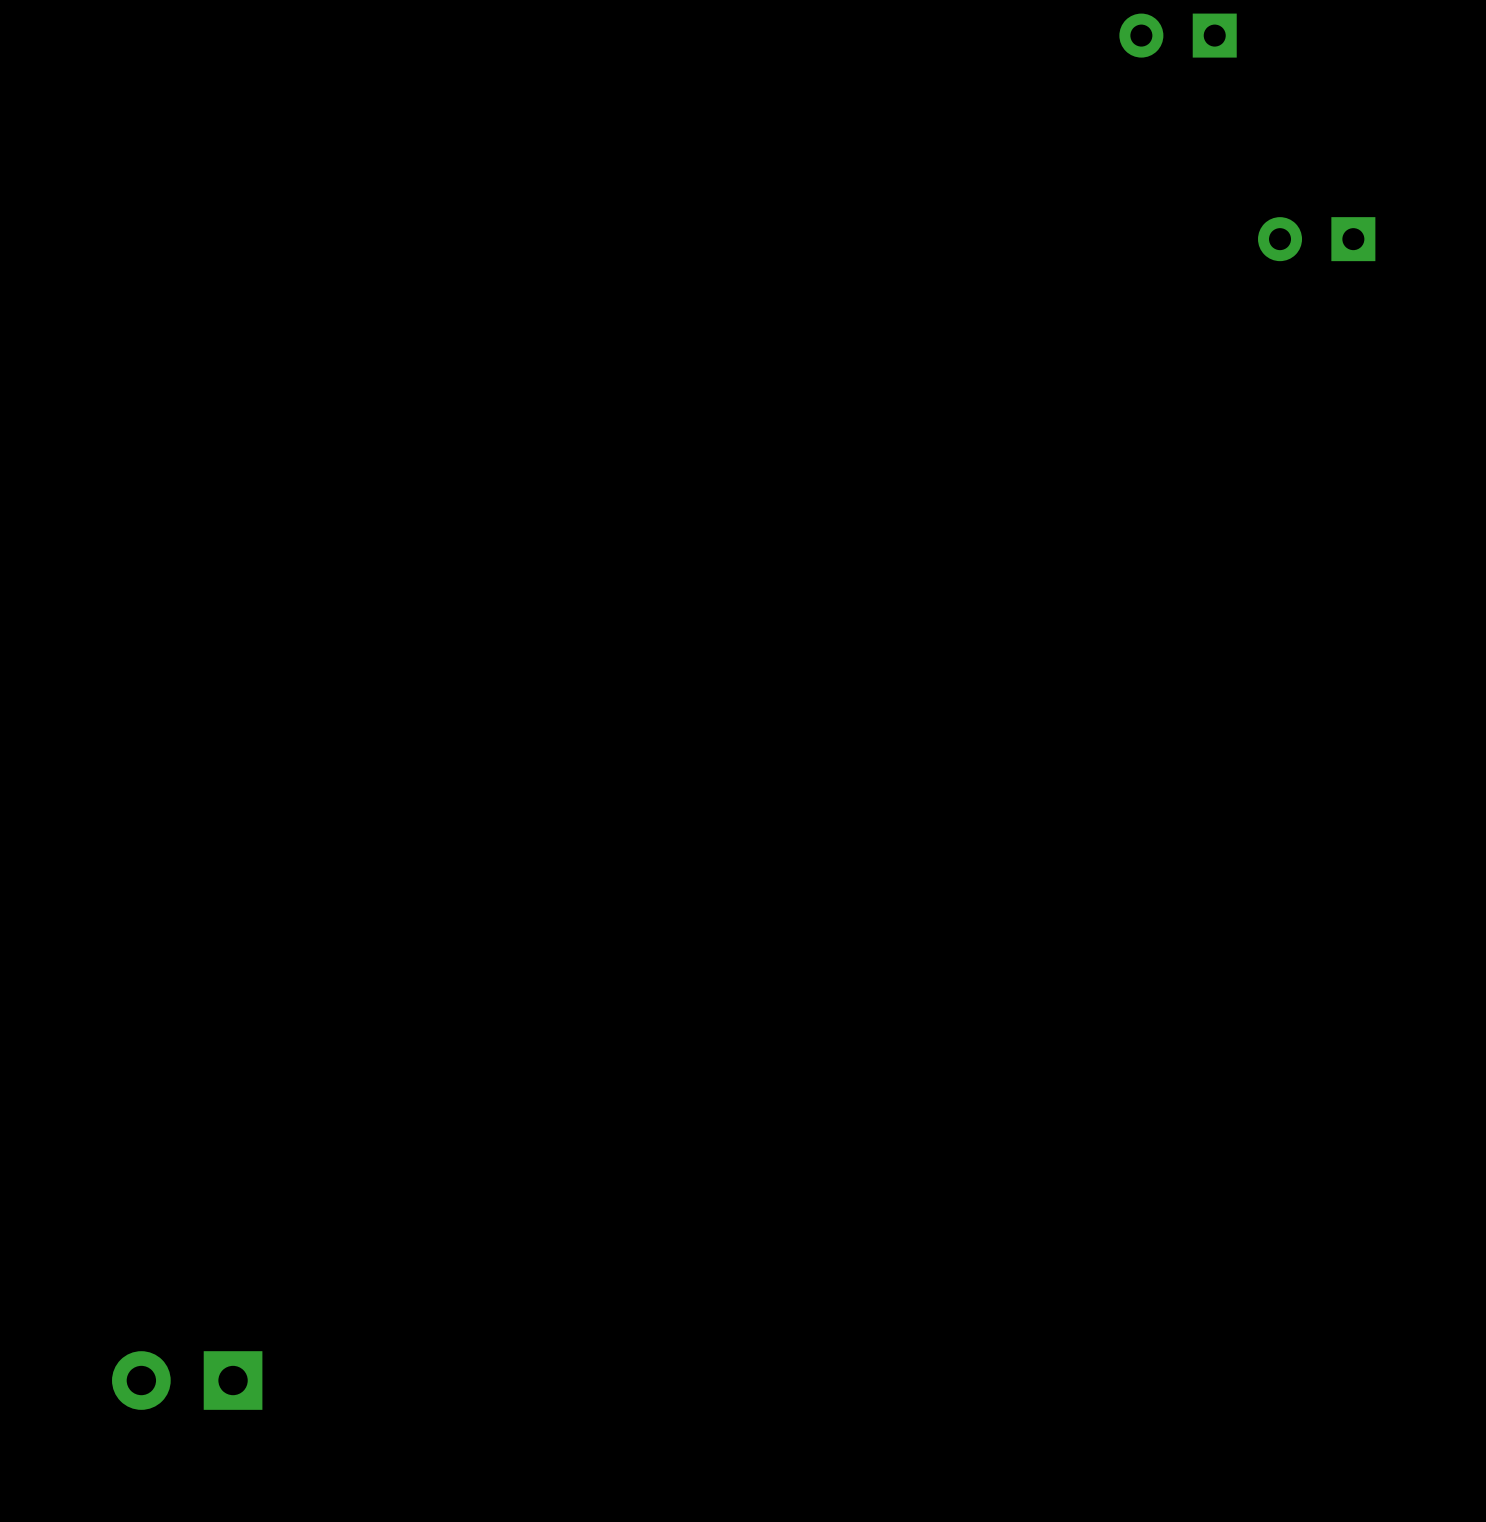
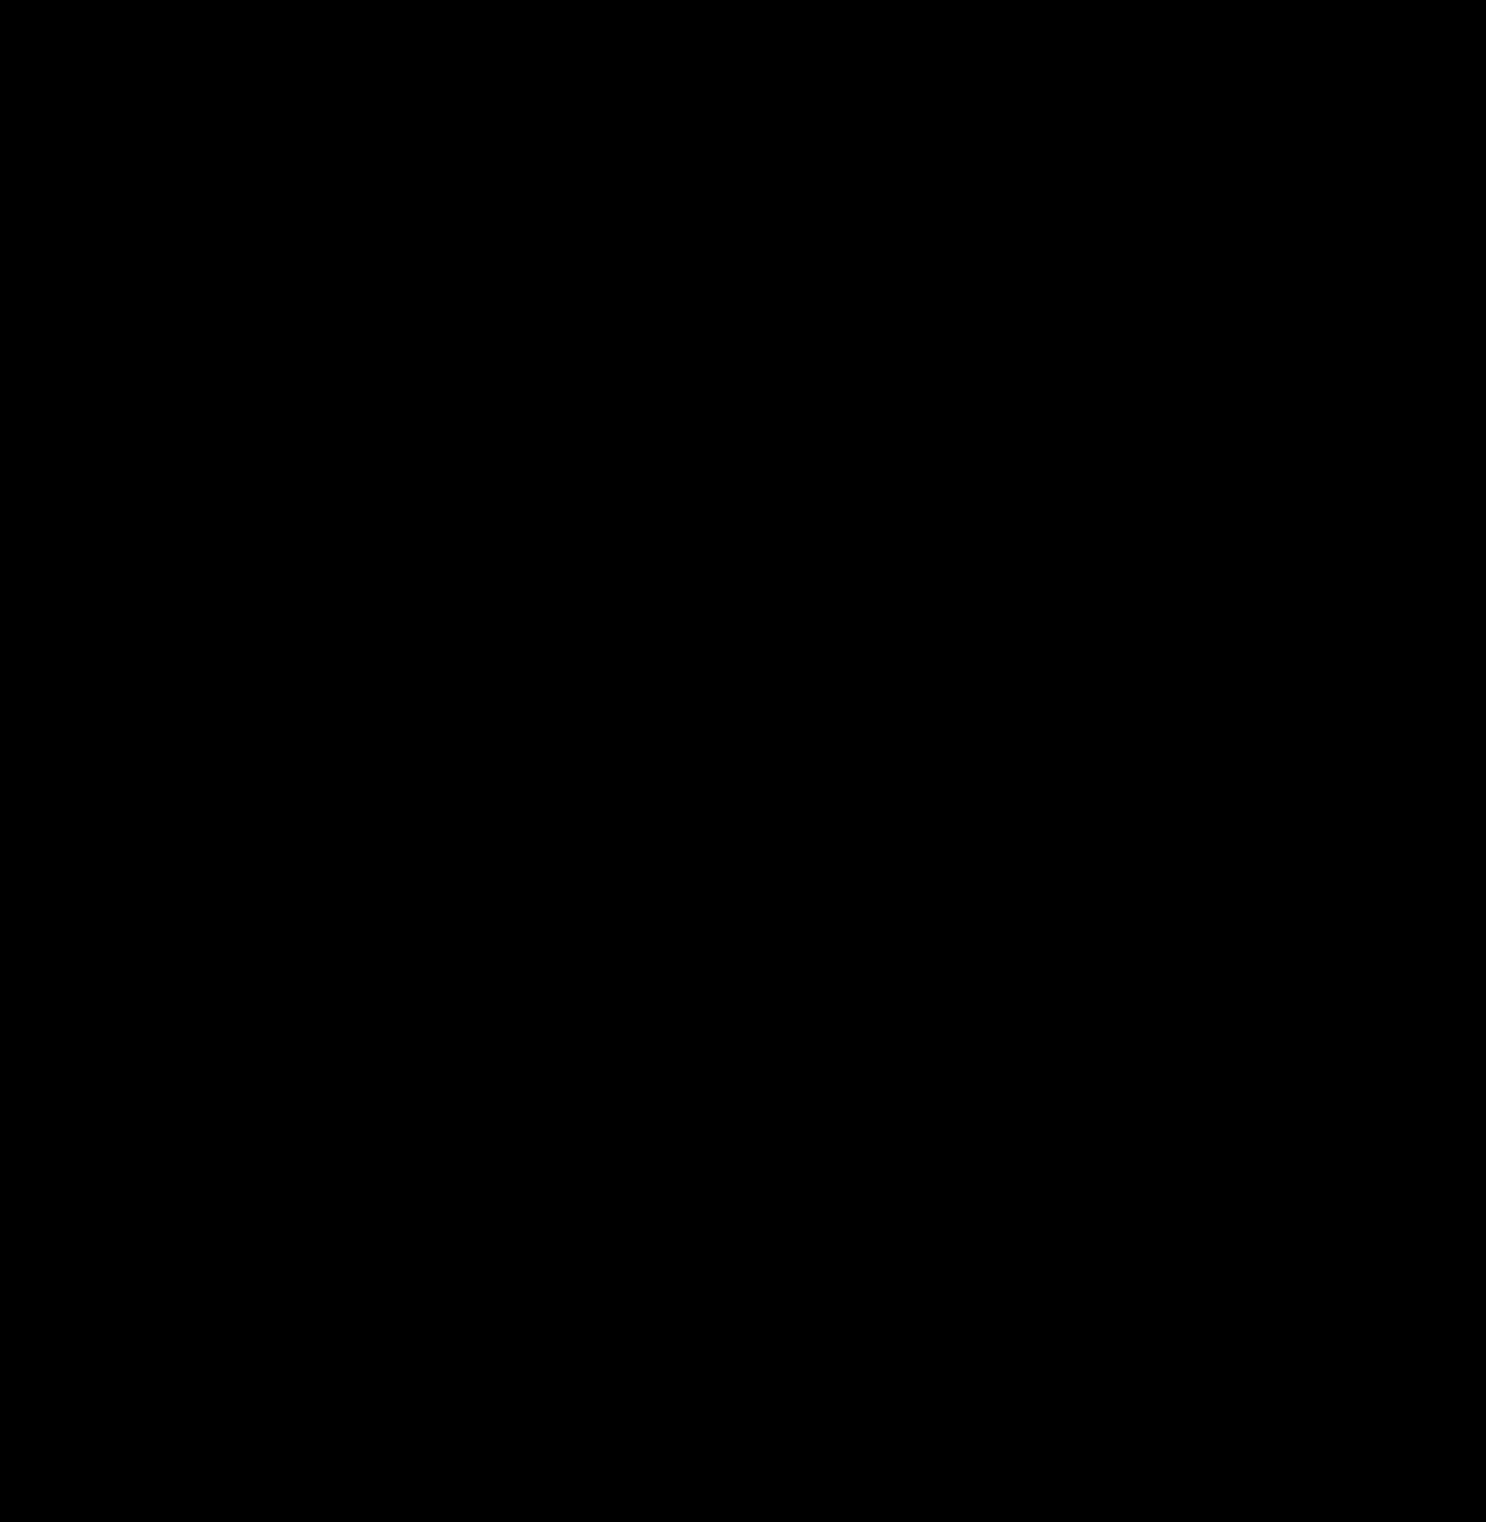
part: (1178, 35) -> none
part: (1316, 239) -> none
part: (187, 1380) -> none

